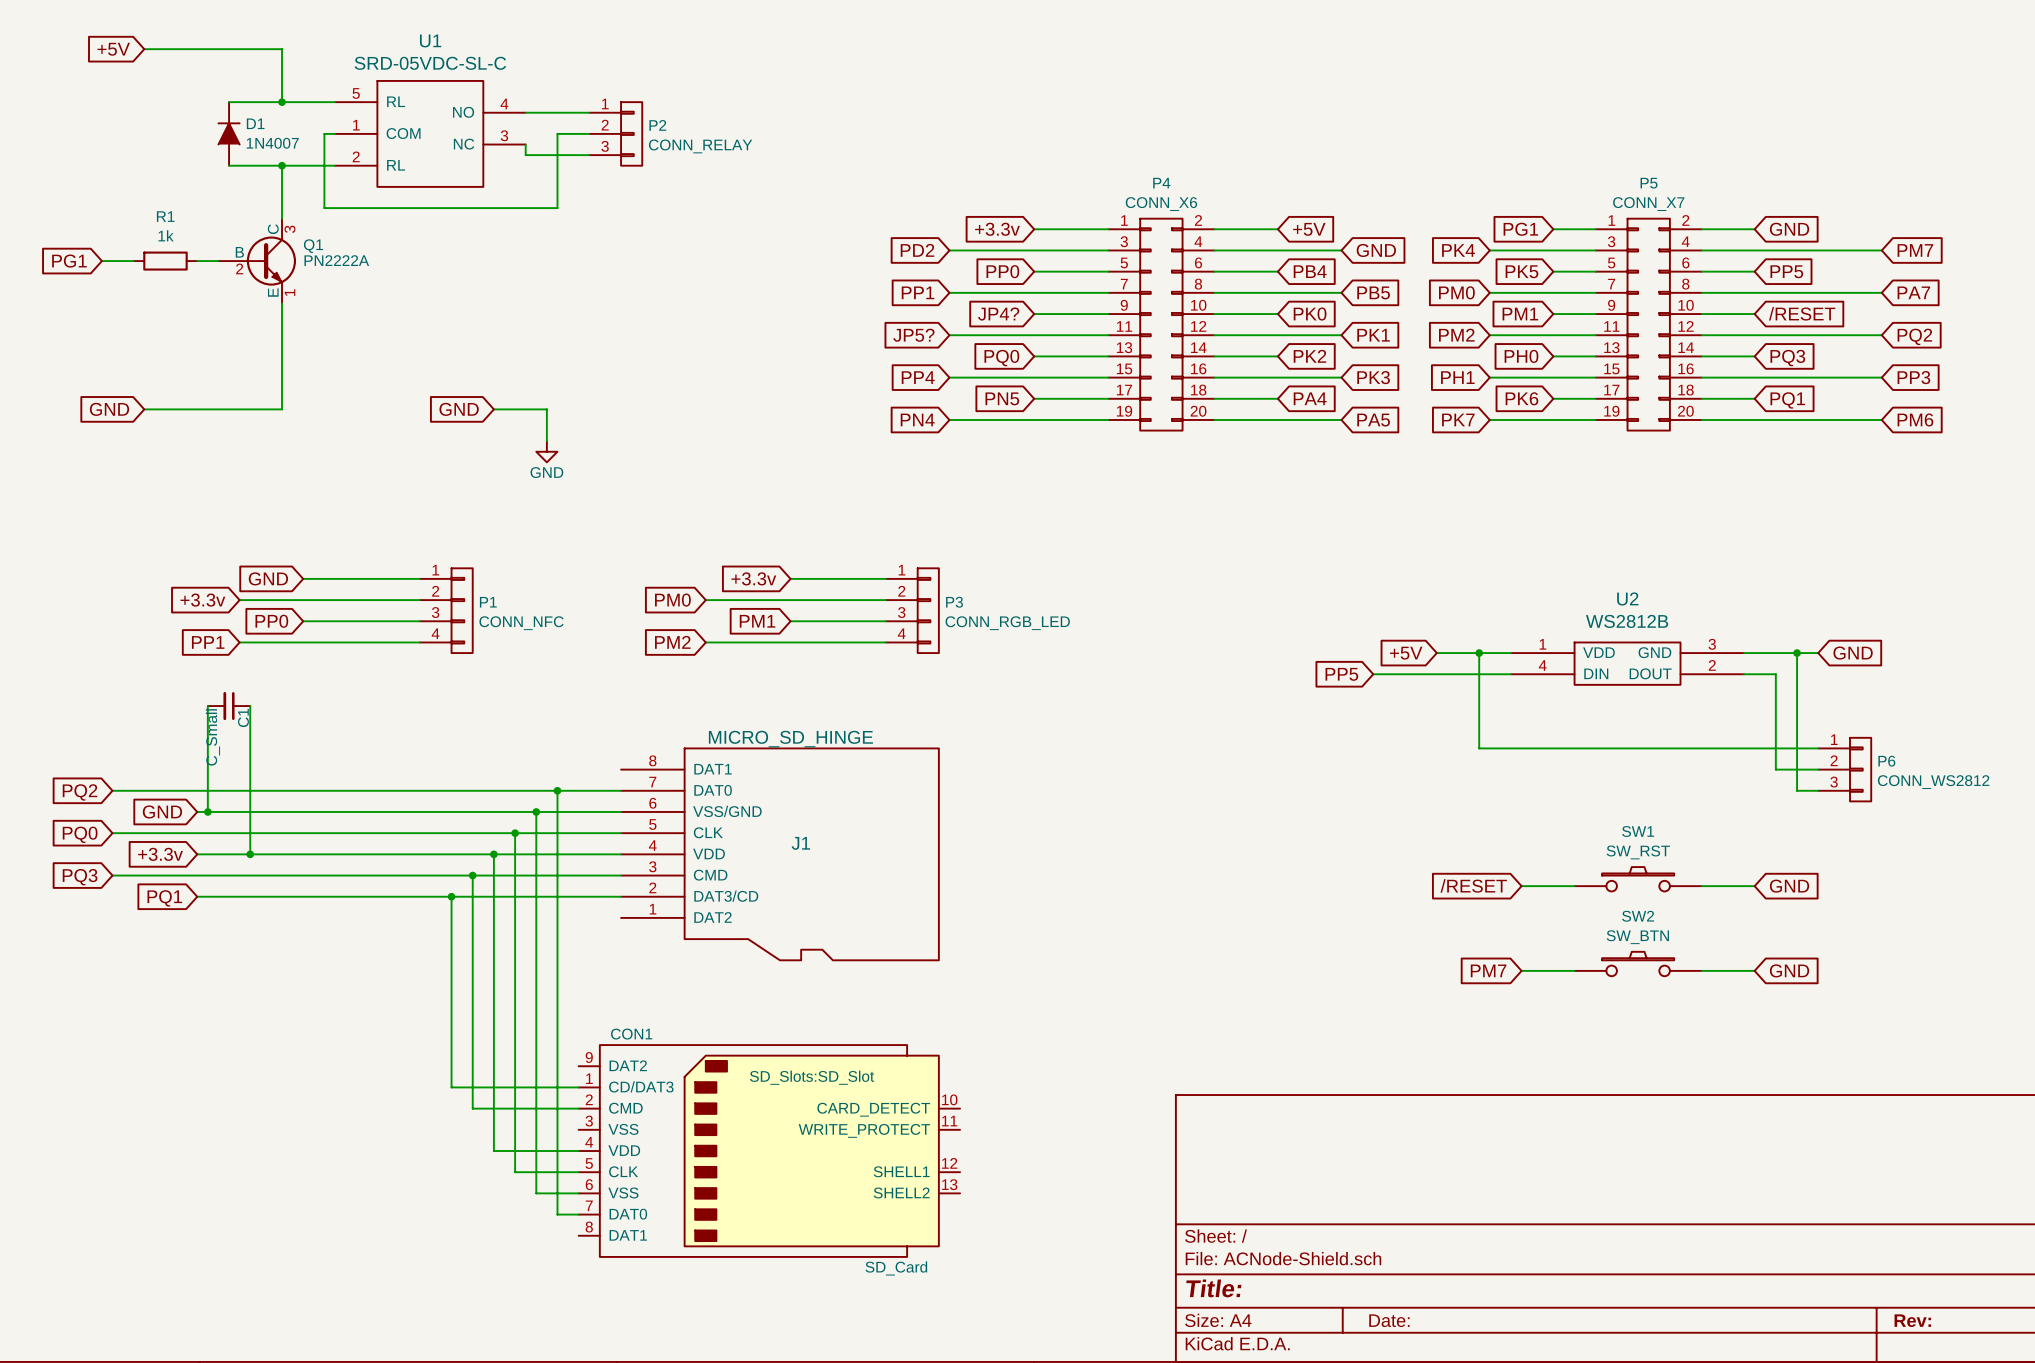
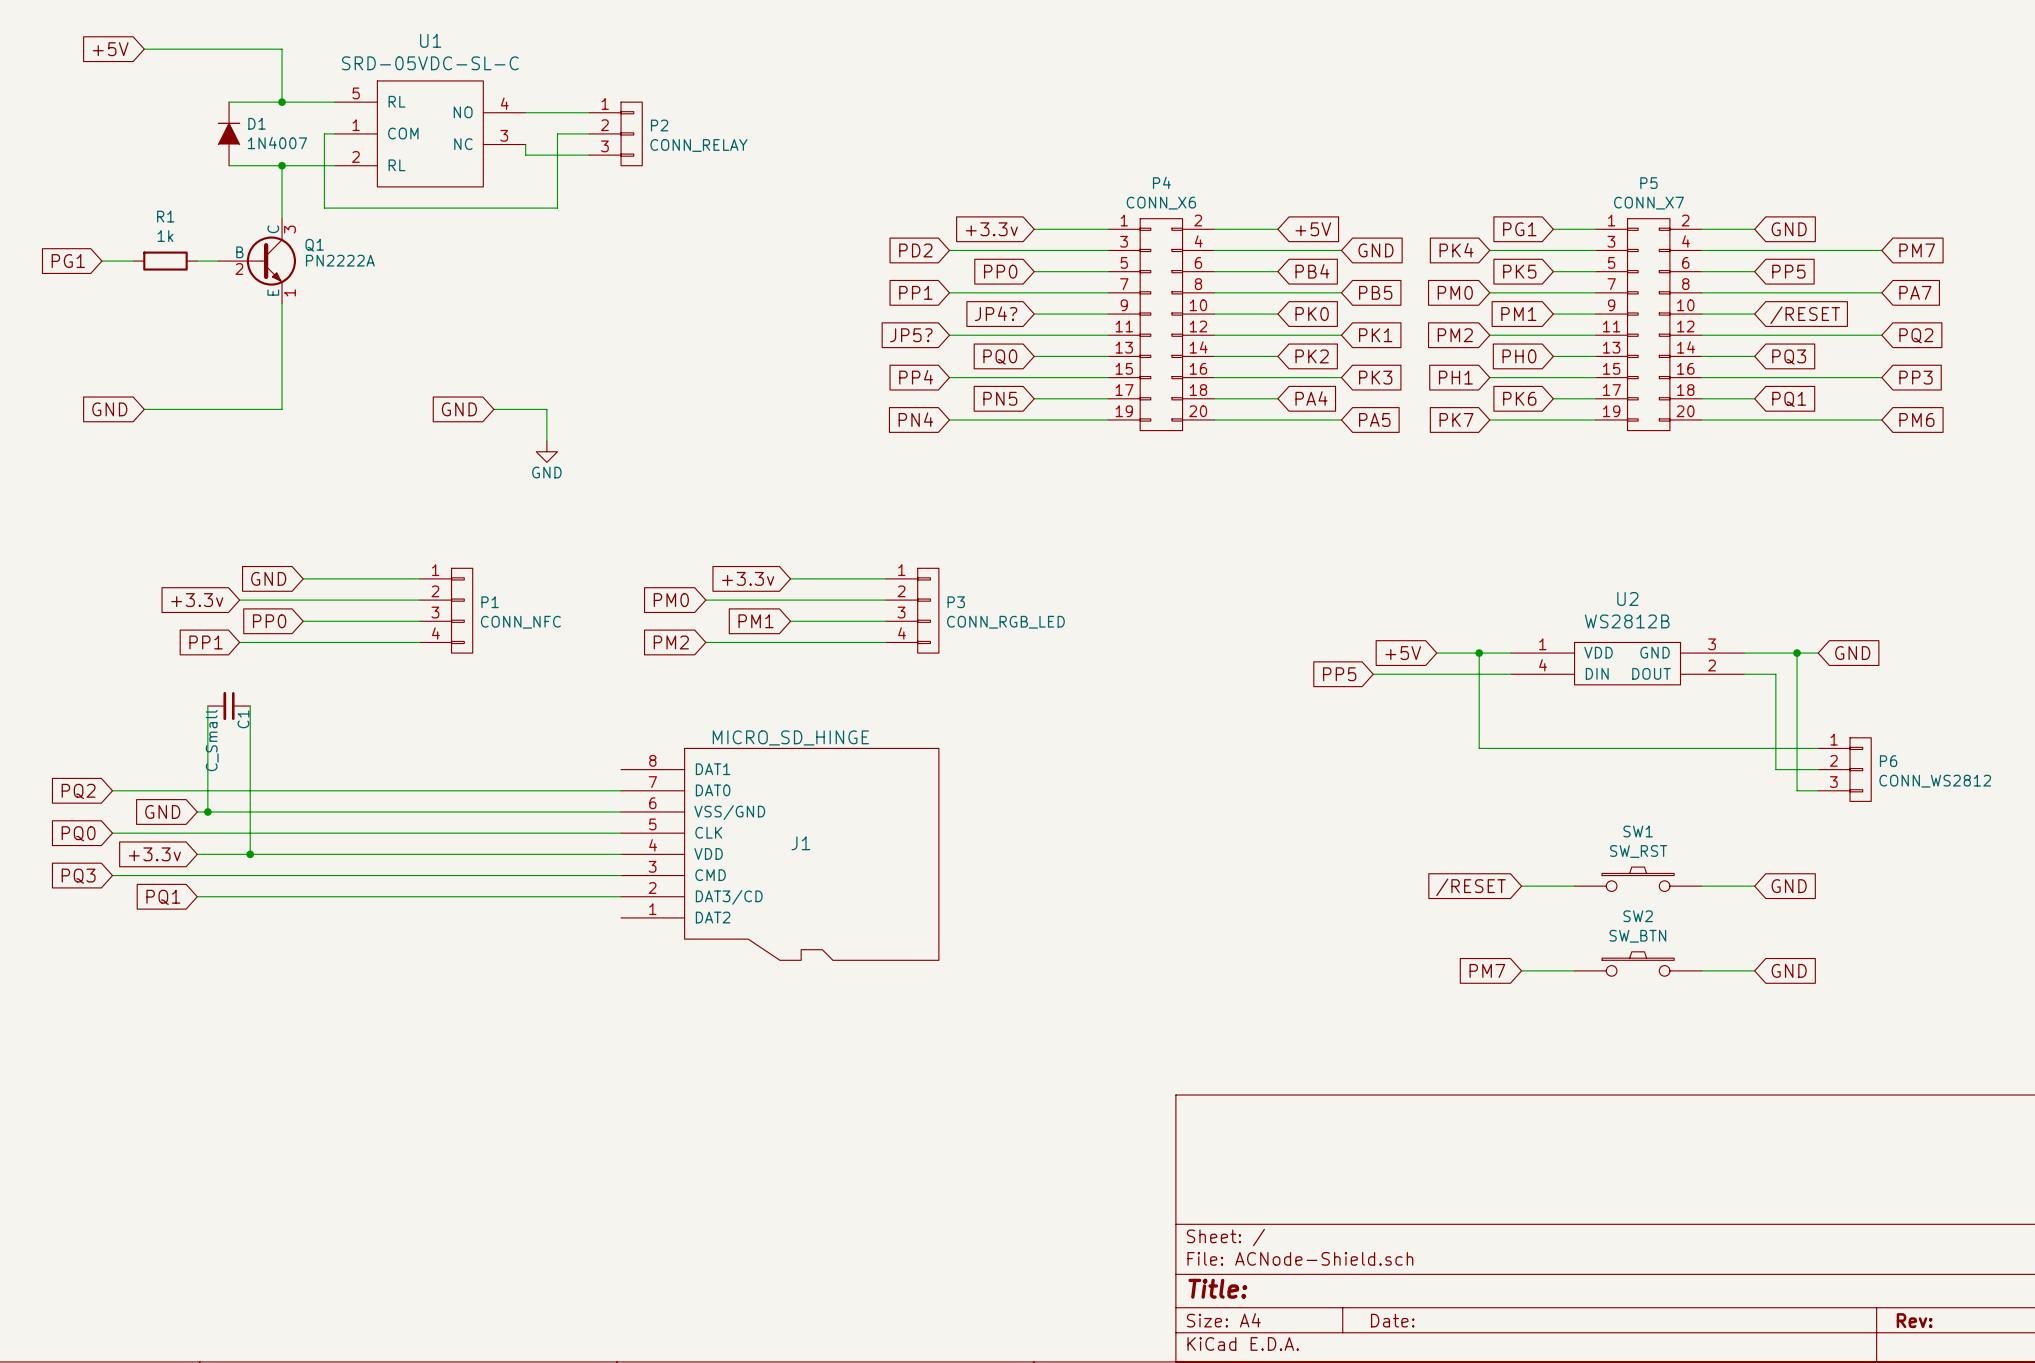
wire: (557, 790) (557, 1214) (578, 1214) -> none
junction: (557, 790) -> none
wire: (536, 811) (536, 1193) (578, 1193) -> none
junction: (536, 811) -> none
wire: (515, 833) (515, 1172) (578, 1172) -> none
junction: (515, 833) -> none
wire: (493, 854) (493, 1151) (578, 1151) -> none
junction: (493, 854) -> none
wire: (472, 875) (472, 1108) (578, 1108) -> none
junction: (472, 875) -> none
wire: (451, 896) (451, 1087) (578, 1087) -> none
junction: (451, 896) -> none
CON1: SD_Card (769, 1151) -> none

